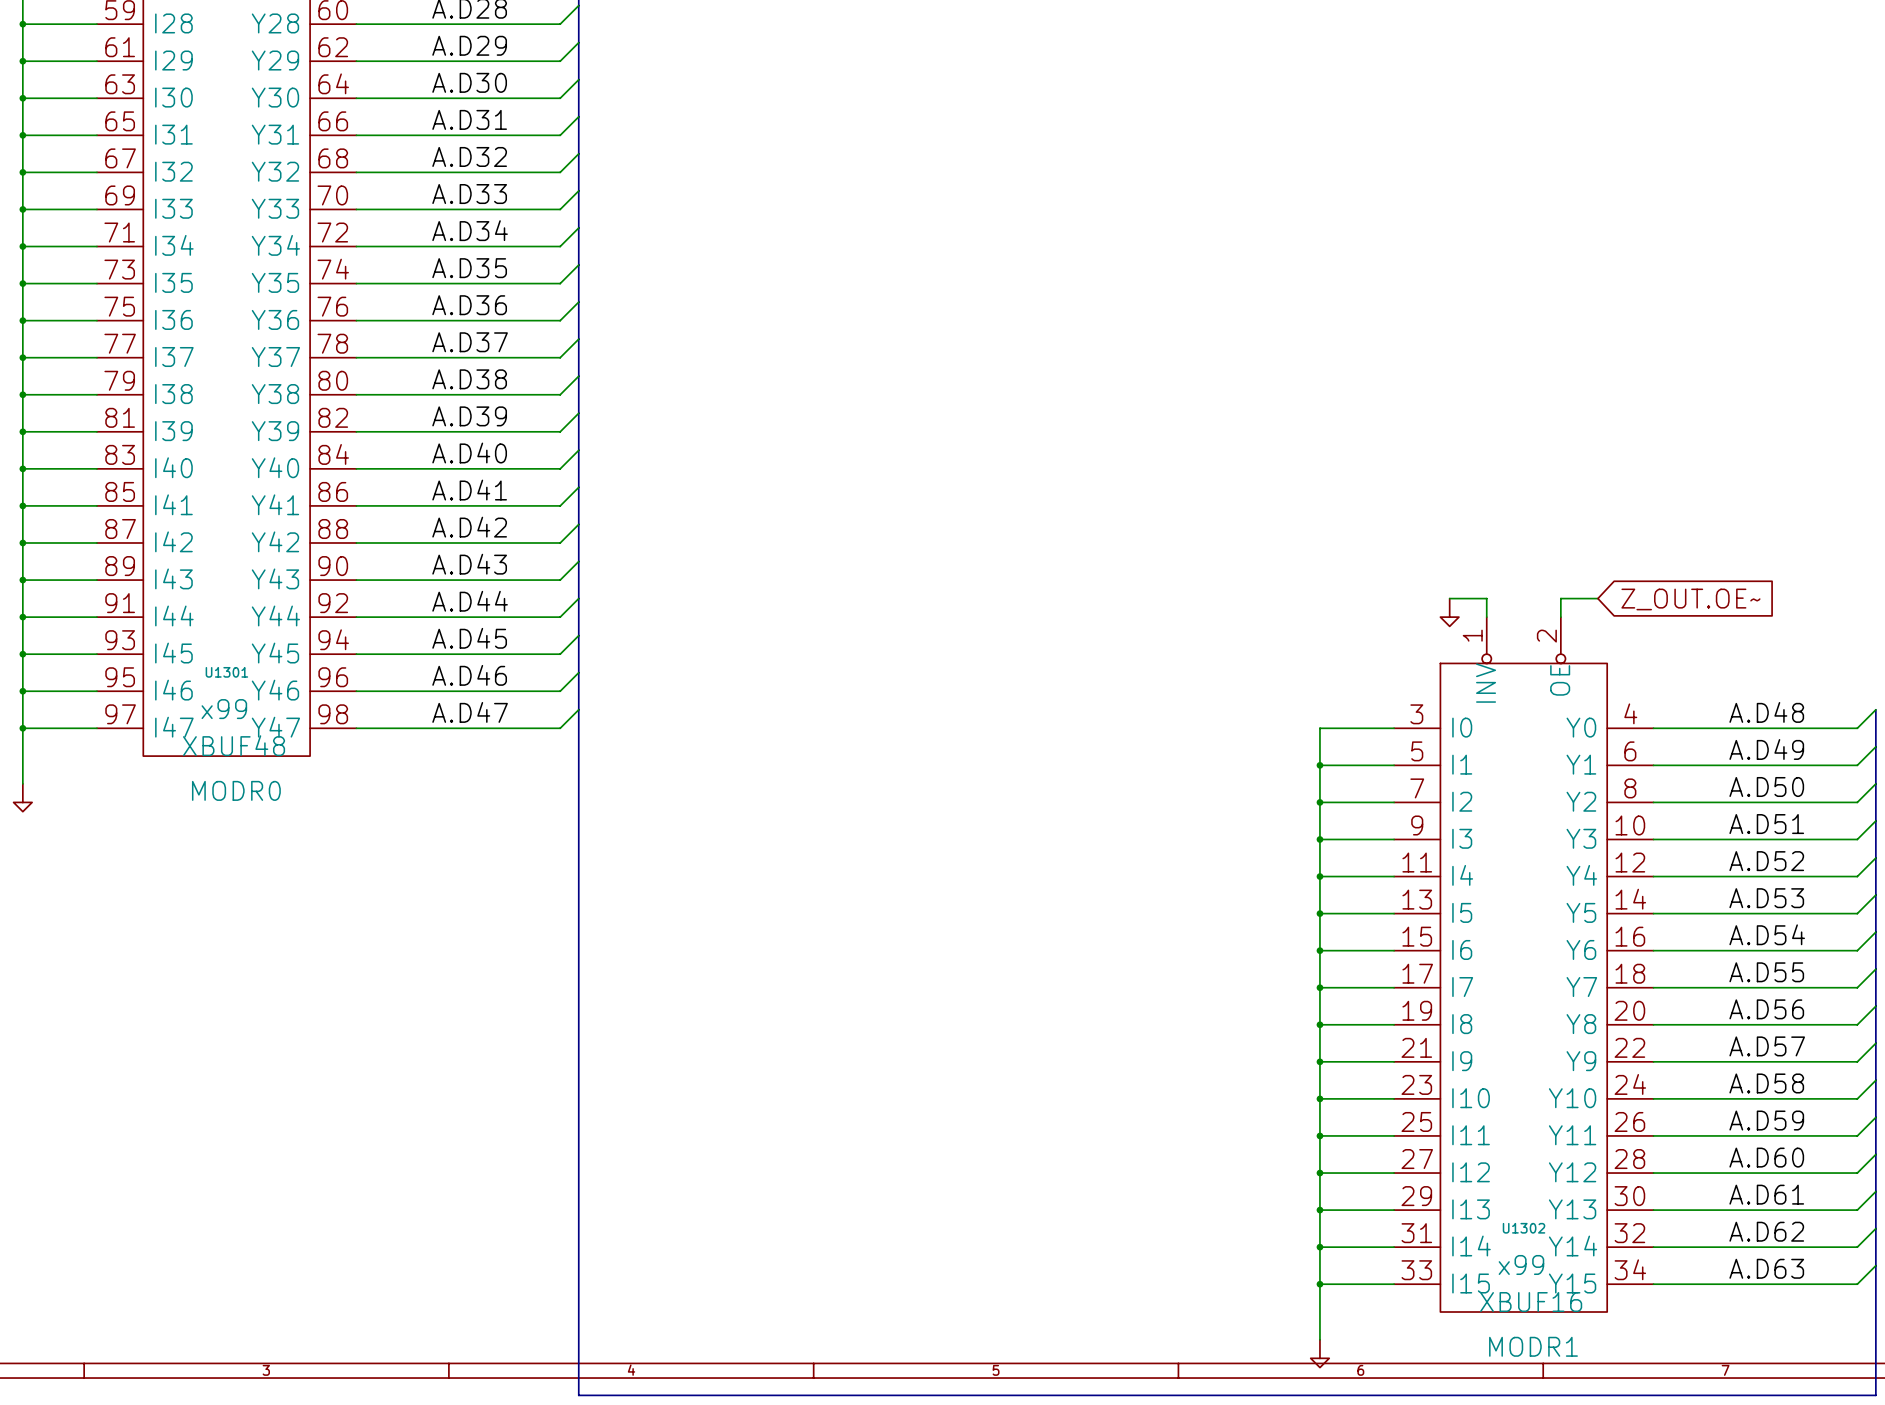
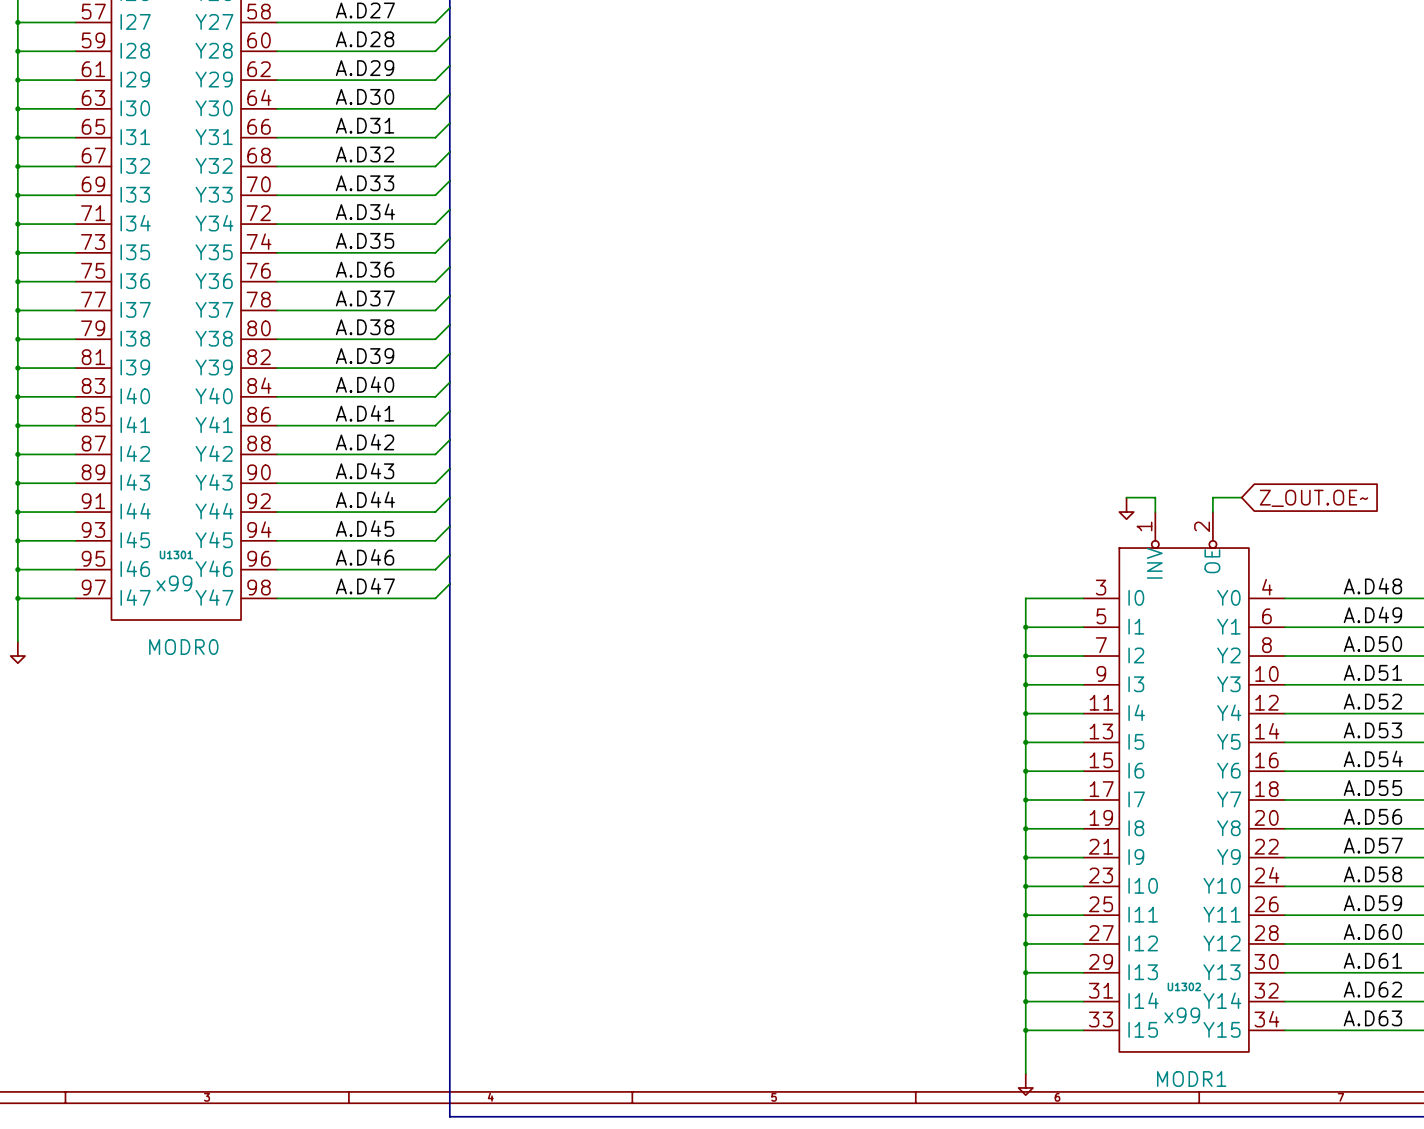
U1301 value: XBUF48 (234, 745) -> none
U1302 value: XBUF16 (1531, 1302) -> none

